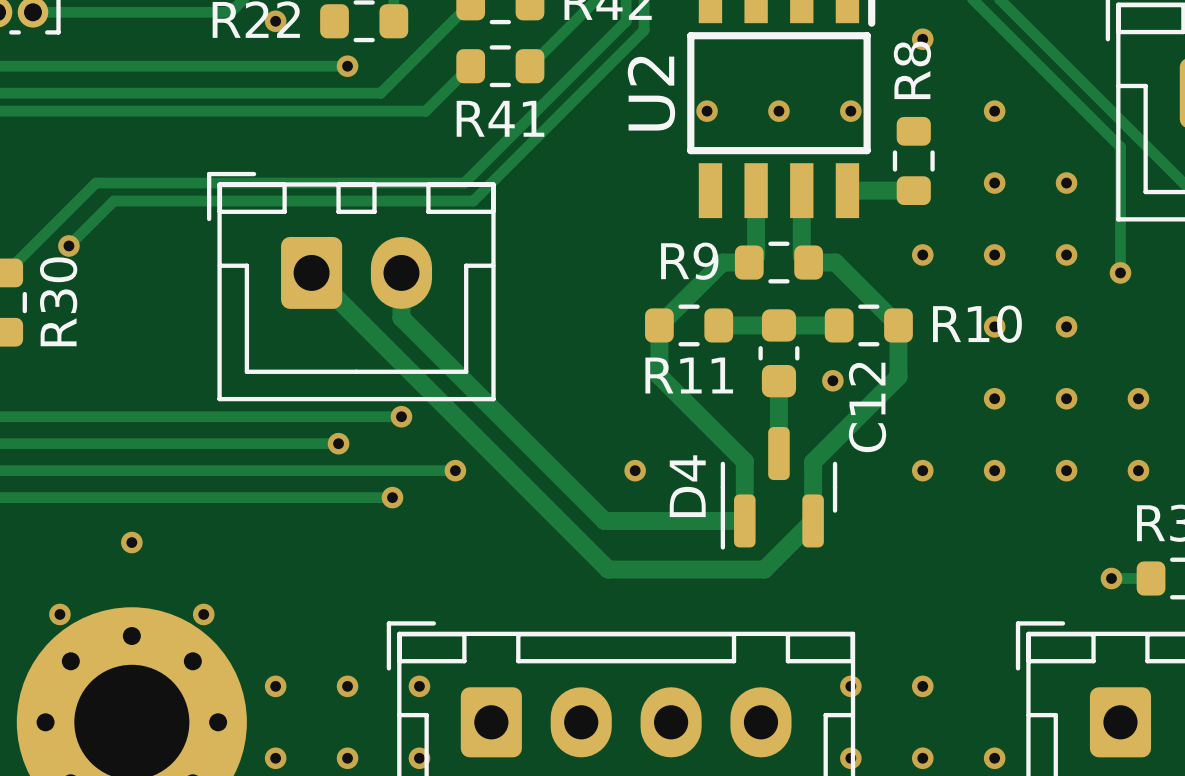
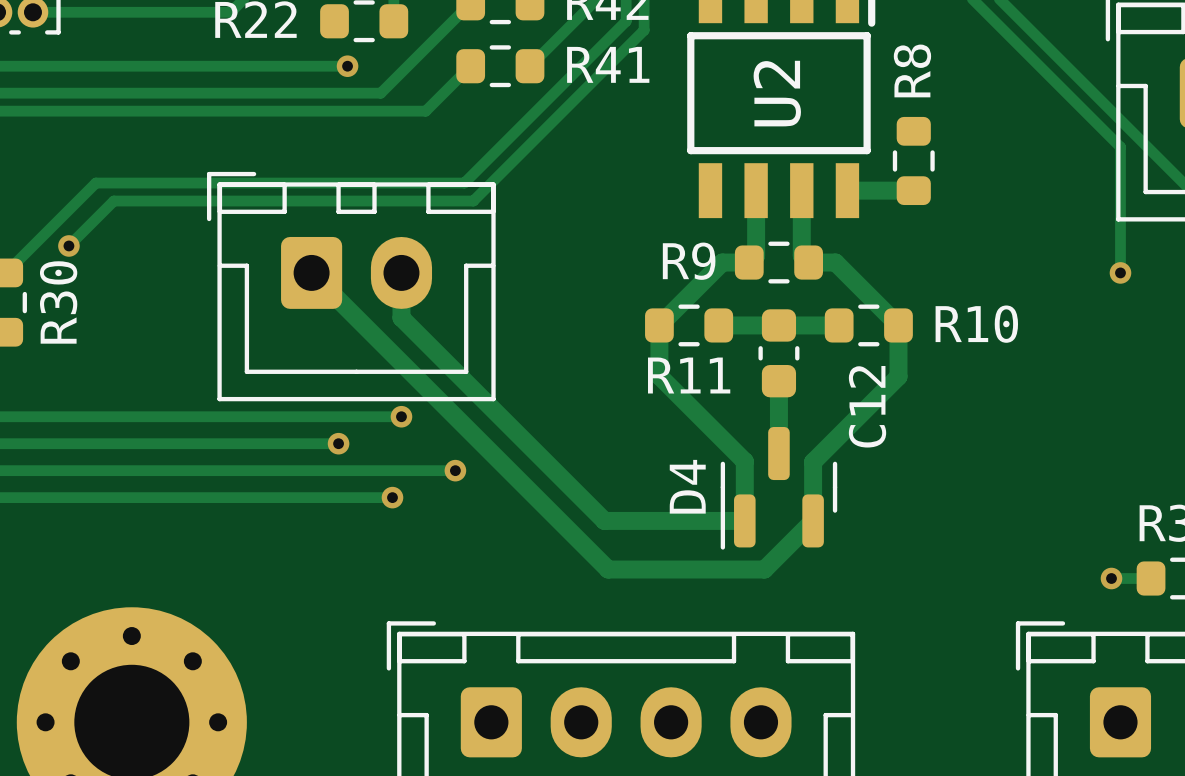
via: (275, 21) -> none
via: (922, 39) -> none
U2 name position: U2 (651, 93) -> U2 (777, 93)
via: (707, 111) -> none
via: (778, 111) -> none
via: (850, 111) -> none
via: (994, 111) -> none
R41 name position: R41 (500, 118) -> R41 (608, 64)
via: (994, 183) -> none
via: (1066, 183) -> none
via: (922, 254) -> none
via: (994, 254) -> none
via: (1066, 254) -> none
via: (994, 326) -> none
via: (1066, 326) -> none
via: (832, 380) -> none
via: (994, 398) -> none
via: (1066, 398) -> none
via: (1138, 398) -> none
via: (635, 470) -> none
via: (922, 470) -> none
via: (994, 470) -> none
via: (1066, 470) -> none
via: (1138, 470) -> none
via: (131, 542) -> none
via: (59, 614) -> none
via: (203, 614) -> none
via: (275, 686) -> none
via: (347, 686) -> none
via: (419, 686) -> none
via: (850, 686) -> none
via: (922, 686) -> none
via: (275, 758) -> none
via: (347, 758) -> none
via: (419, 758) -> none
via: (850, 758) -> none
via: (922, 758) -> none
via: (994, 758) -> none

